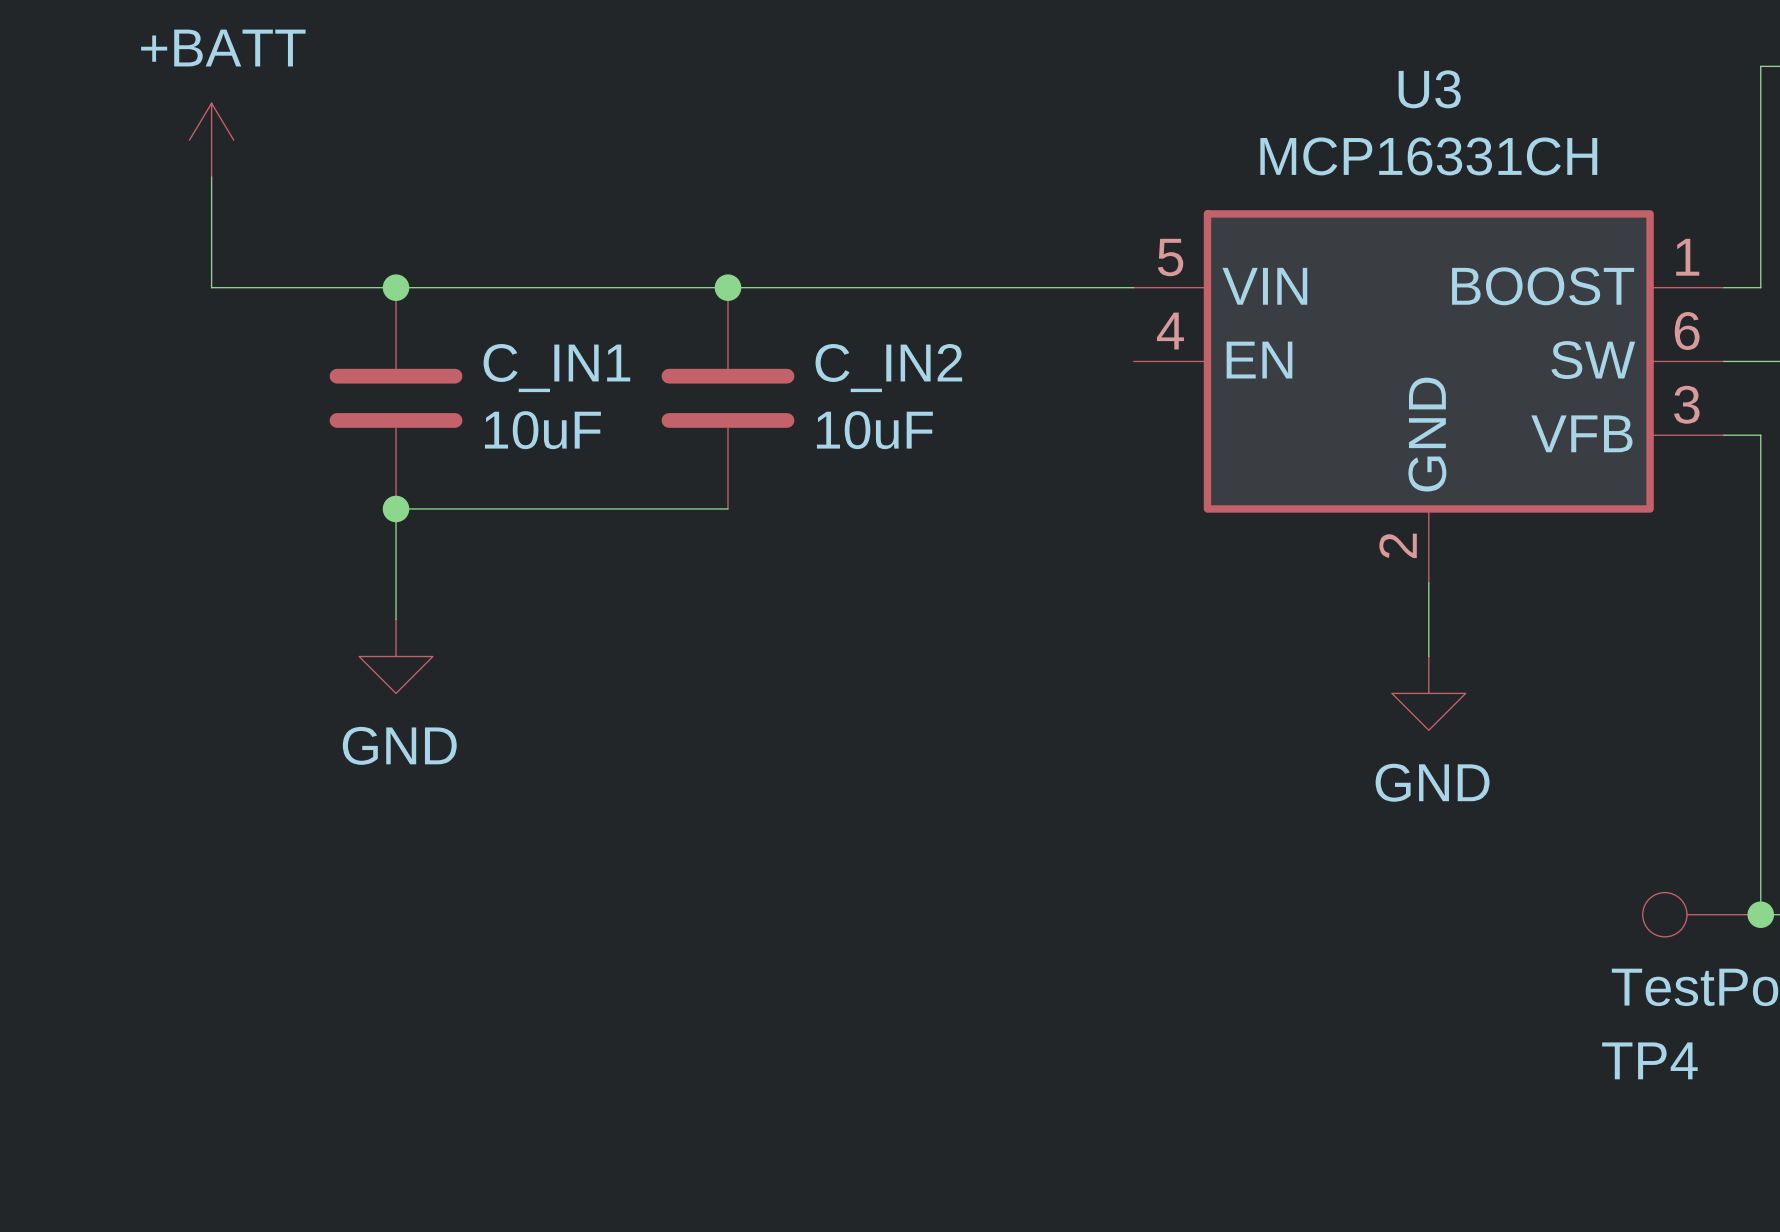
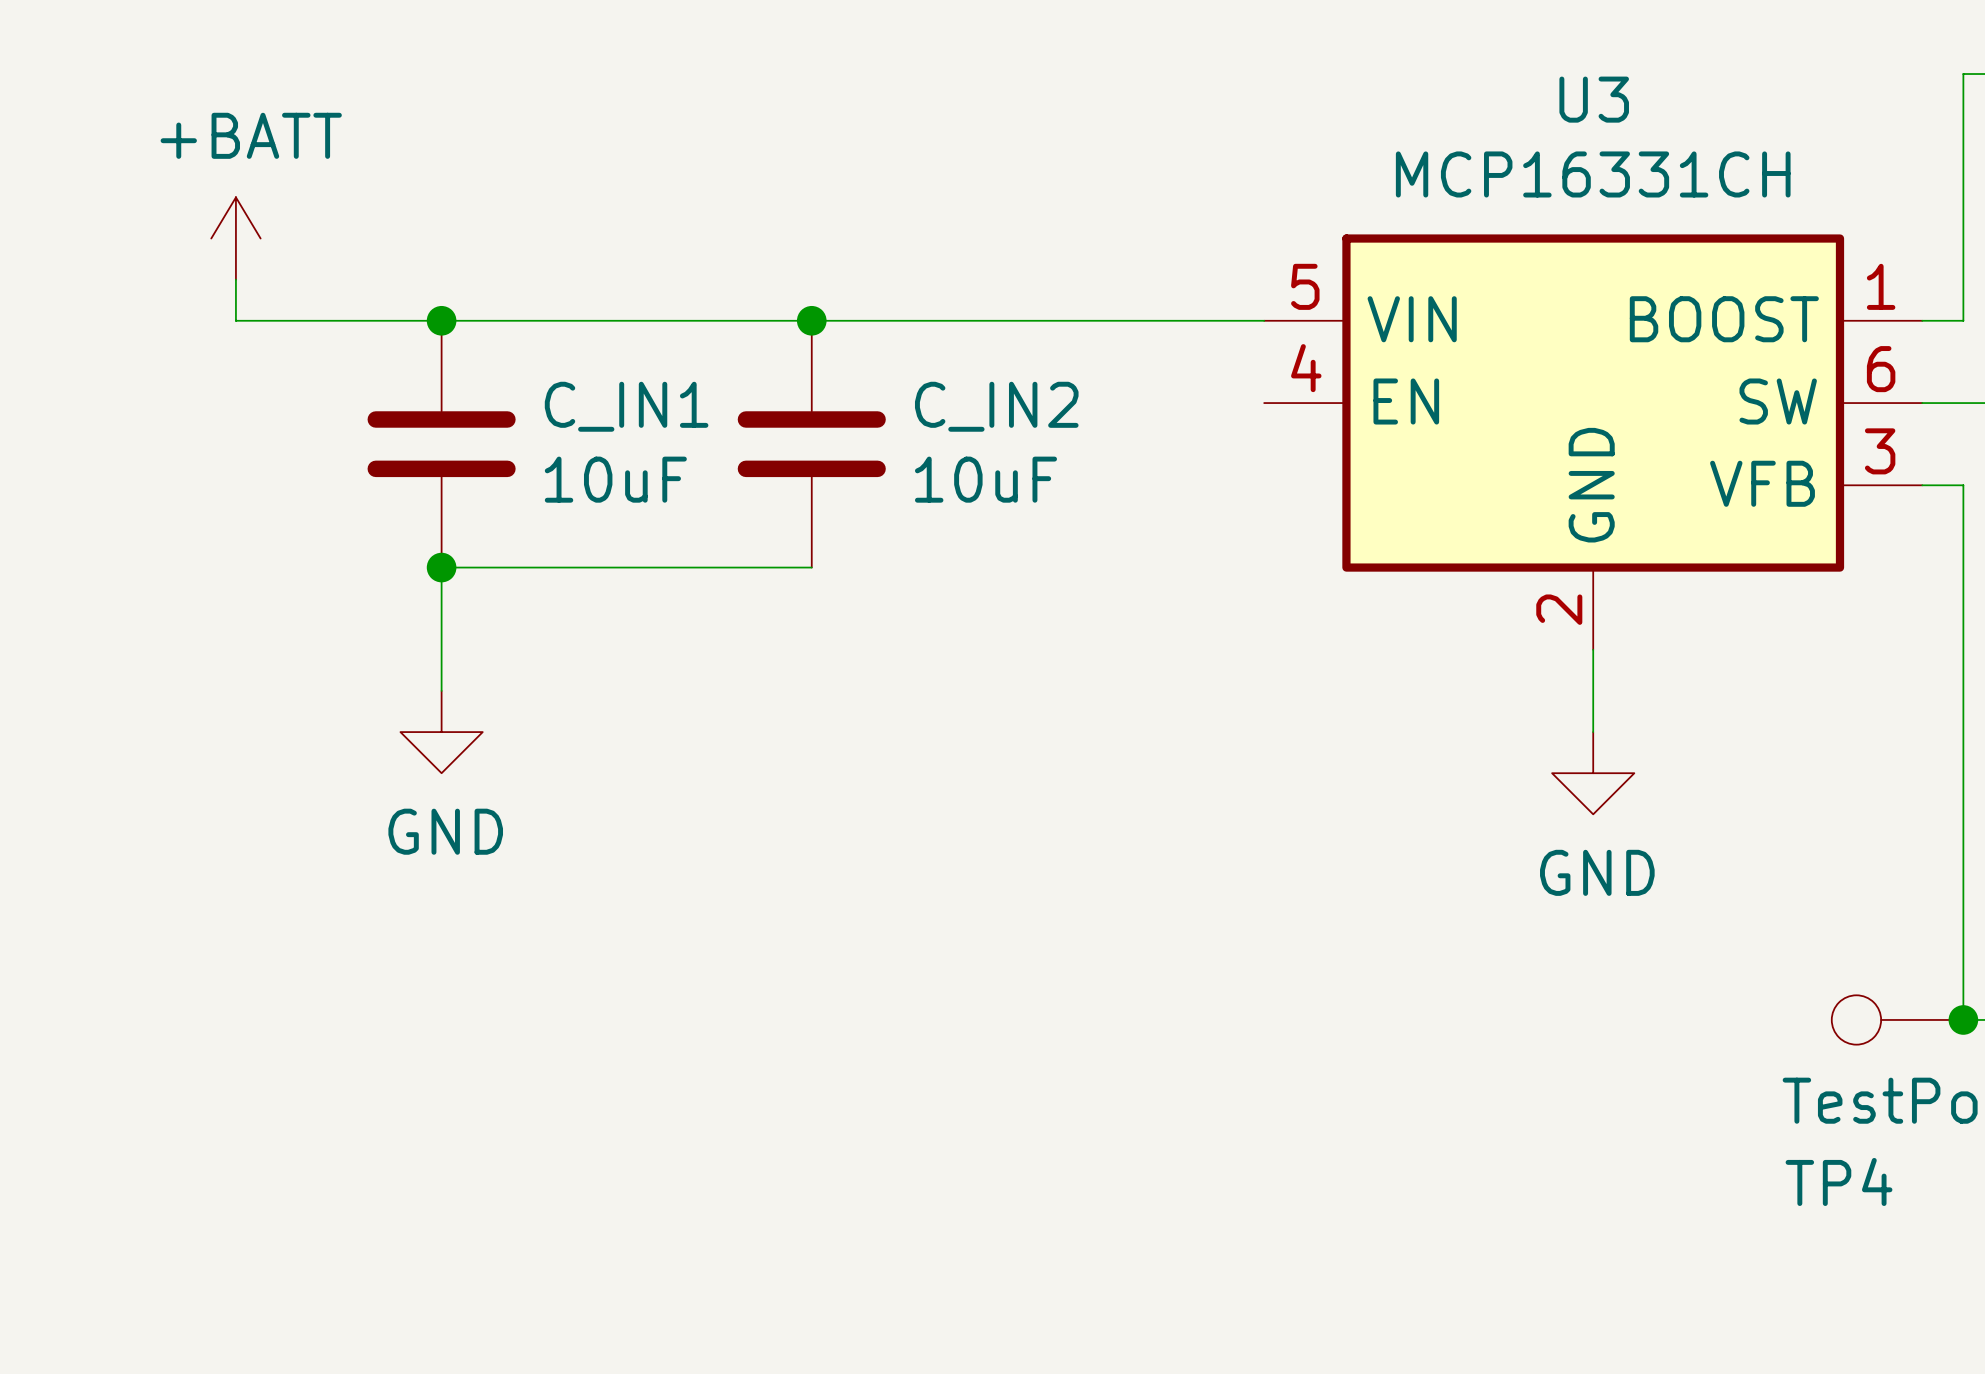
power symbol position: +BATT (211, 140) -> +BATT (235, 238)

